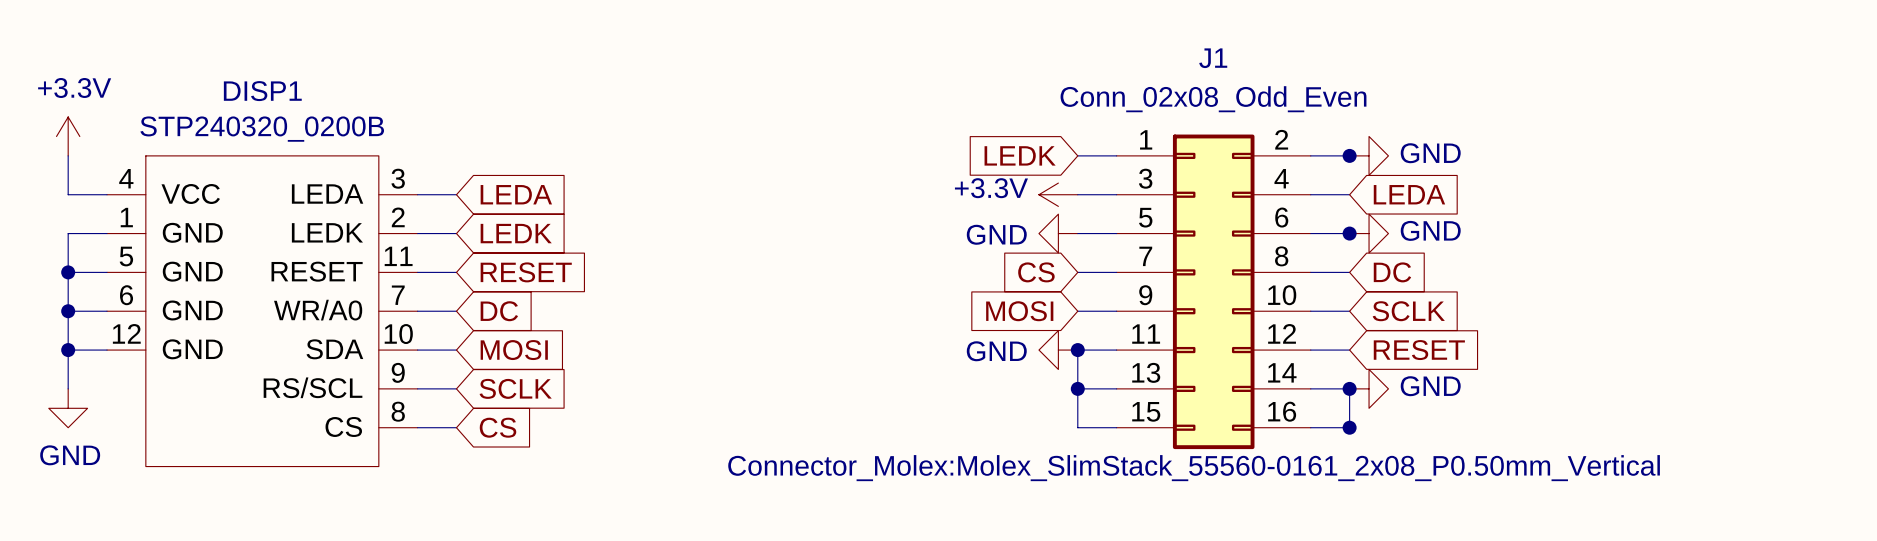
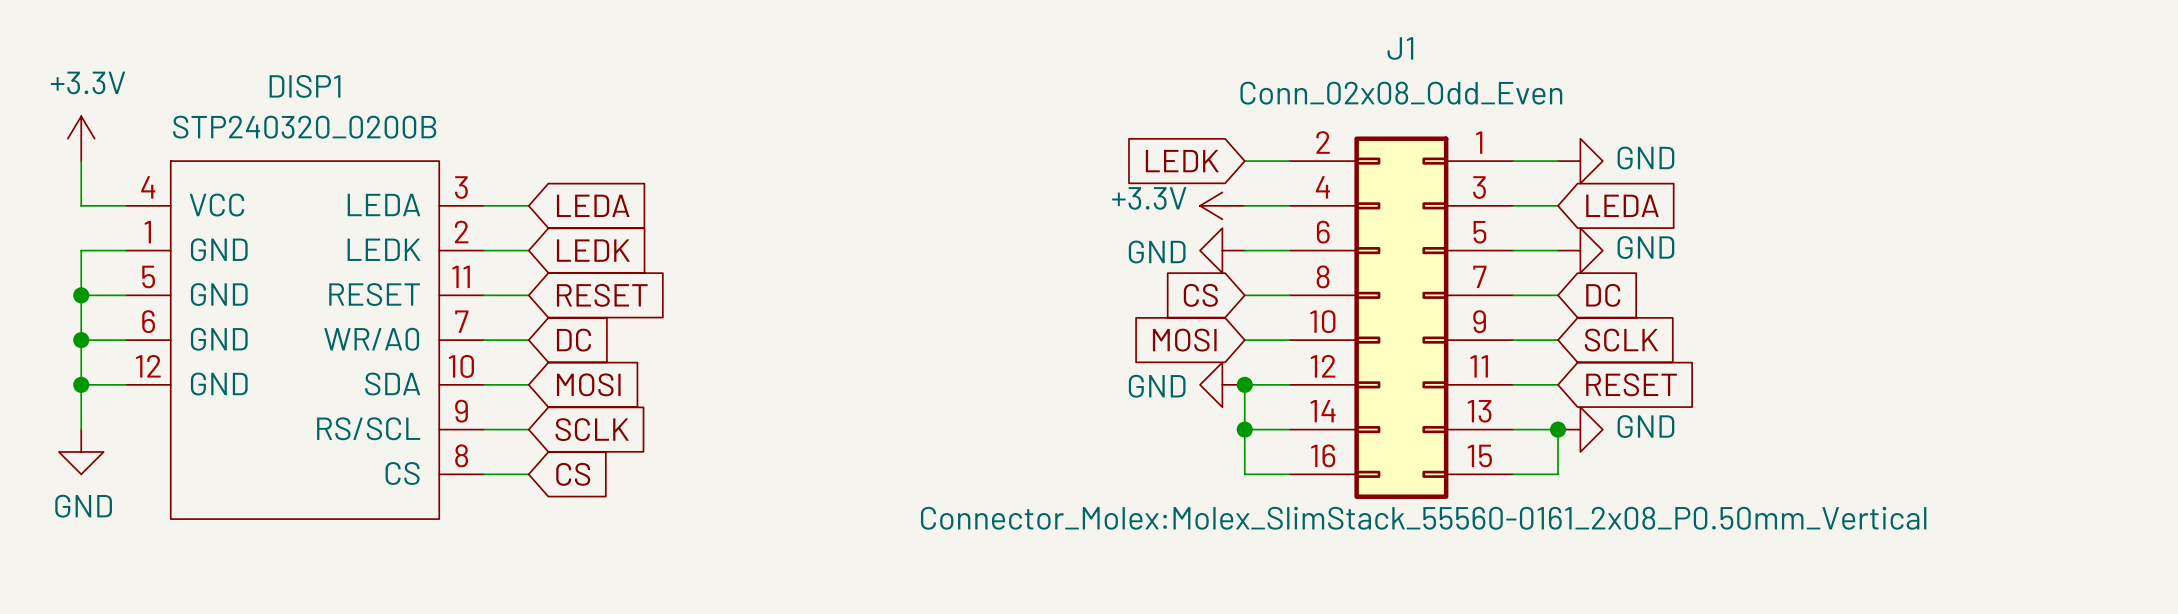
junction: (1349, 155) -> none
junction: (1349, 233) -> none
J1 flip: as is (1213, 291) -> left-right (1401, 317)
junction: (1349, 427) -> none

